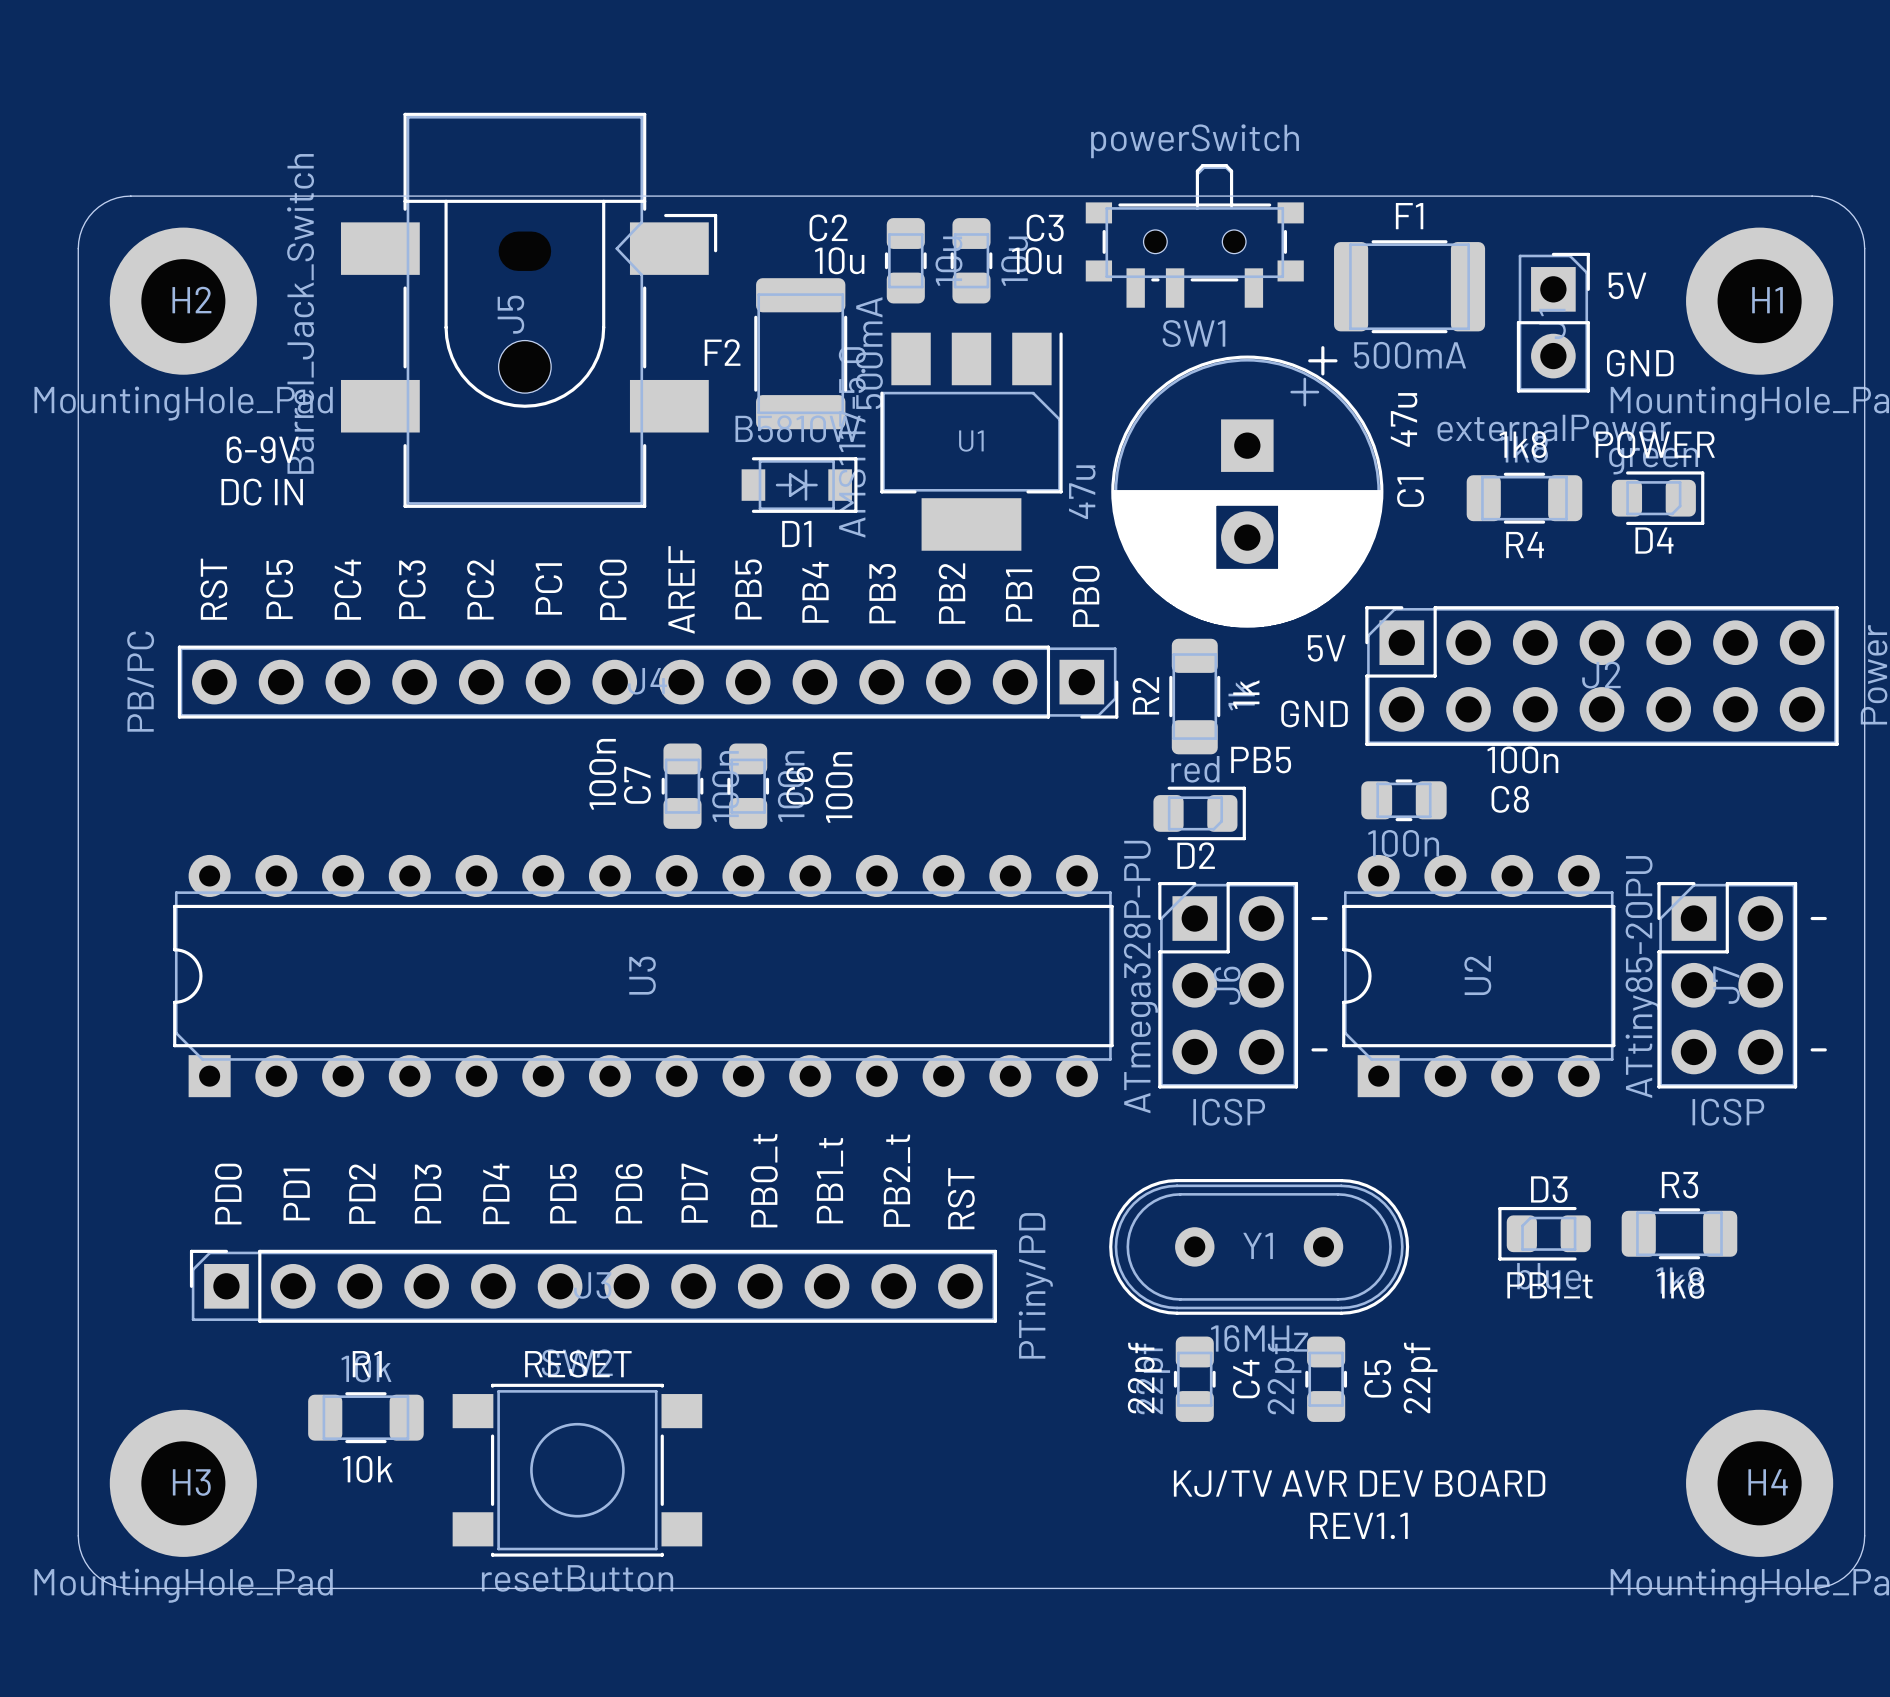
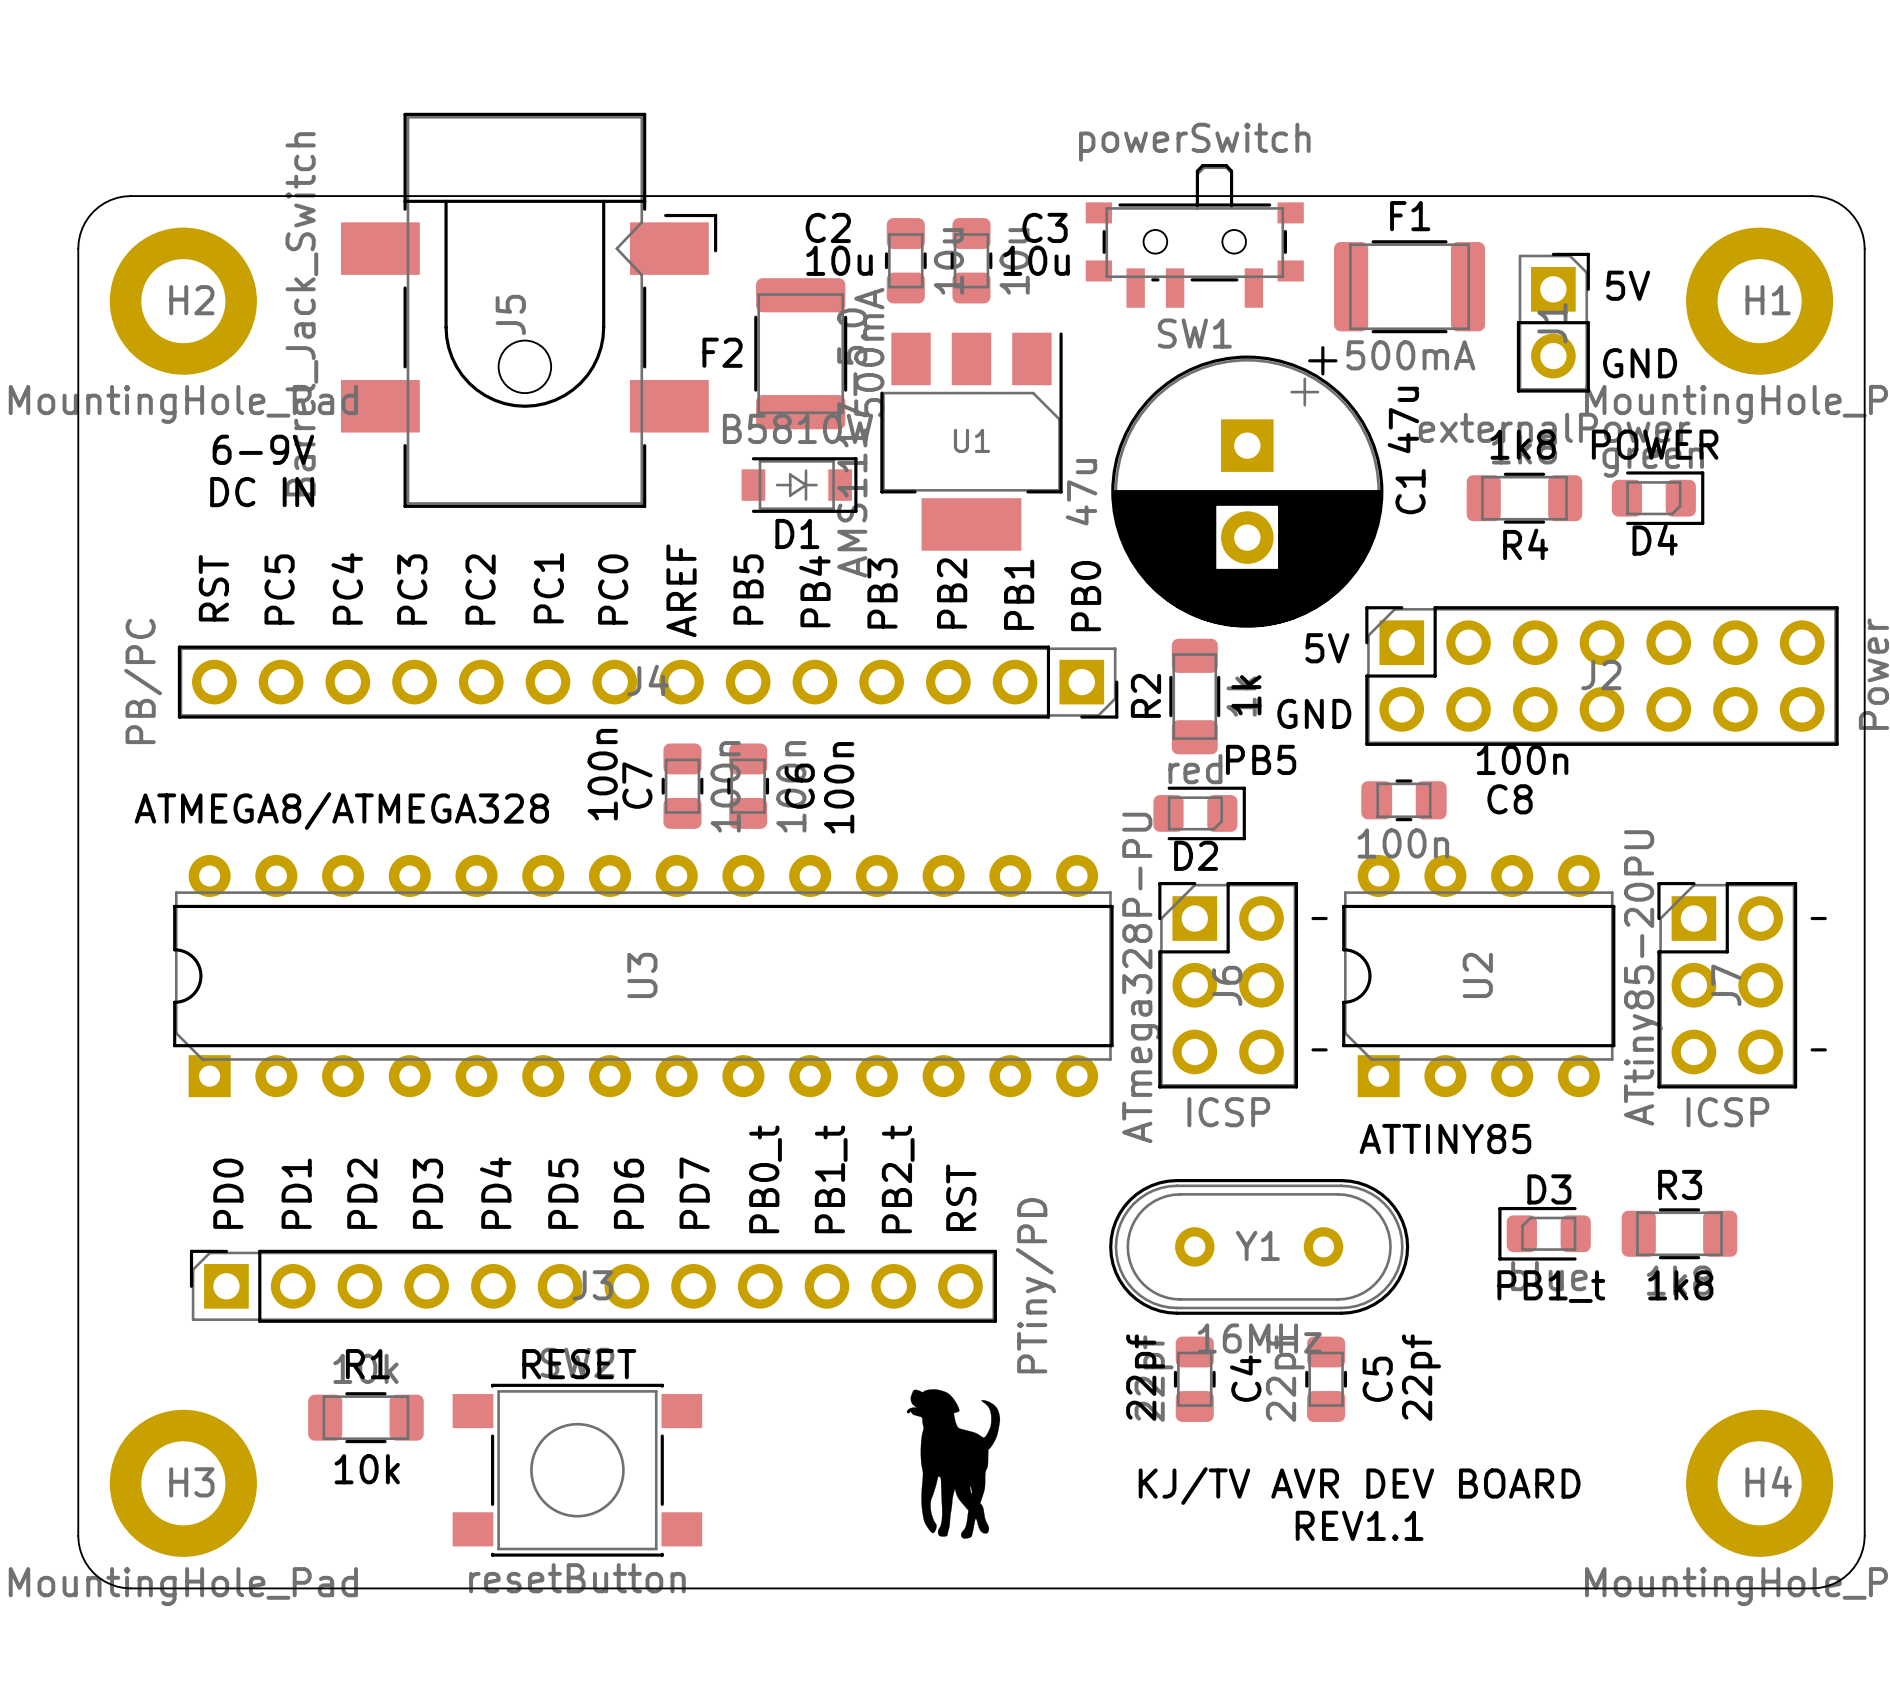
text: none -> ATMEGA8/ATMEGA328 (341, 811)
text: none -> ATTINY85 (1445, 1139)
drawing: none -> [906, 1389, 1001, 1539]

